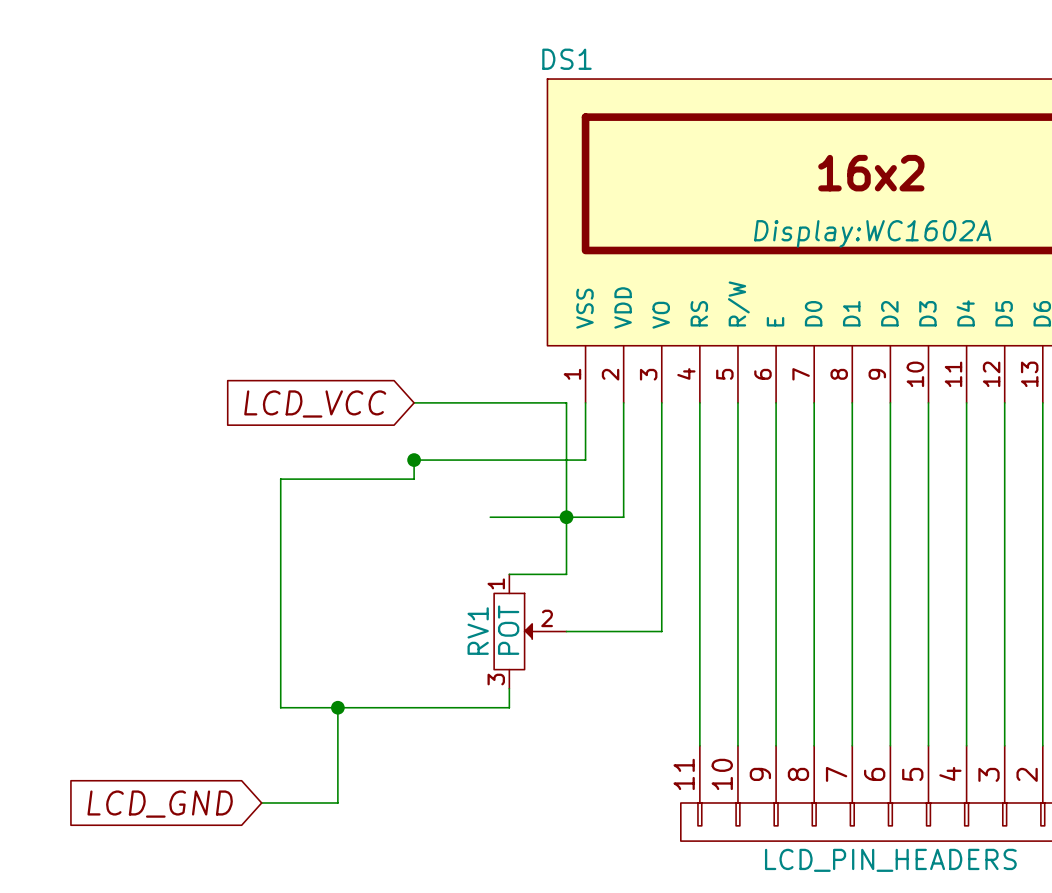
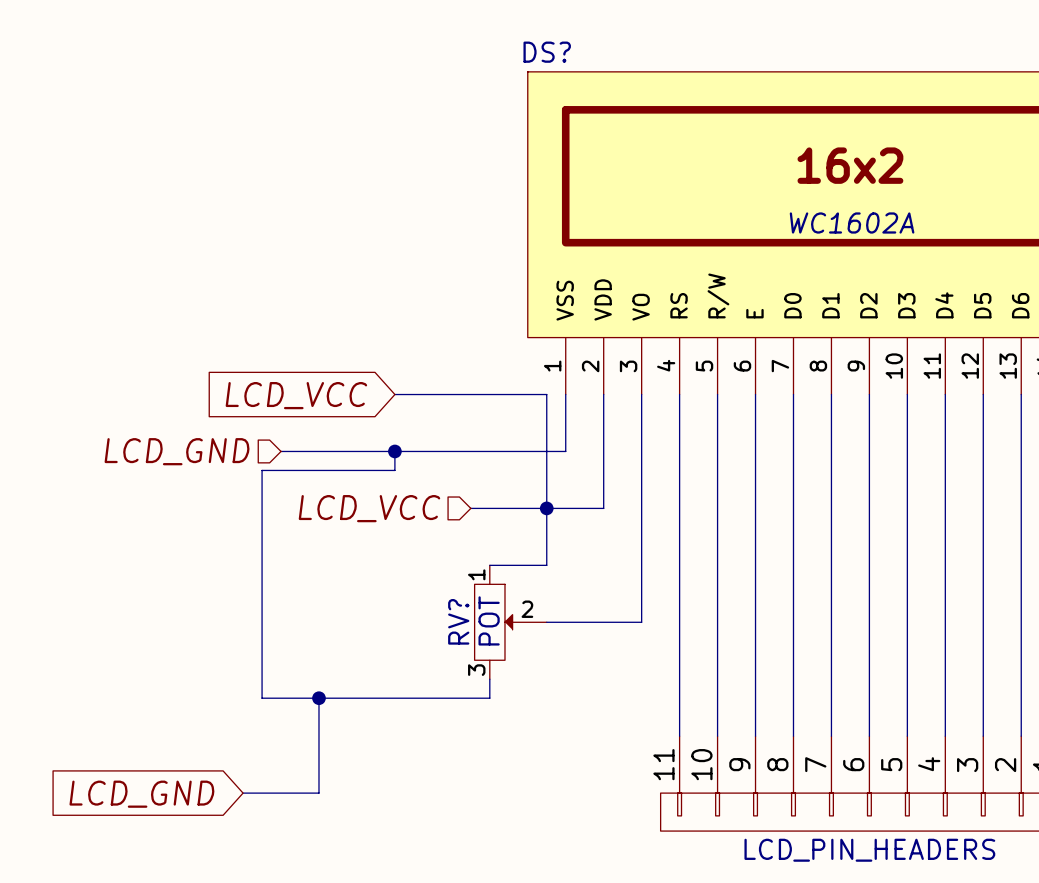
DS1 name: DS1 (566, 59) -> DS? (547, 52)
DS1 text: Display:WC1602A (872, 233) -> WC1602A (852, 223)
hierarchical label: none -> LCD_GND (177, 451)
wire: none -> (281, 451) (394, 451)
hierarchical label: none -> LCD_VCC (369, 508)
RV1 name: RV1 (478, 631) -> RV? (458, 621)

